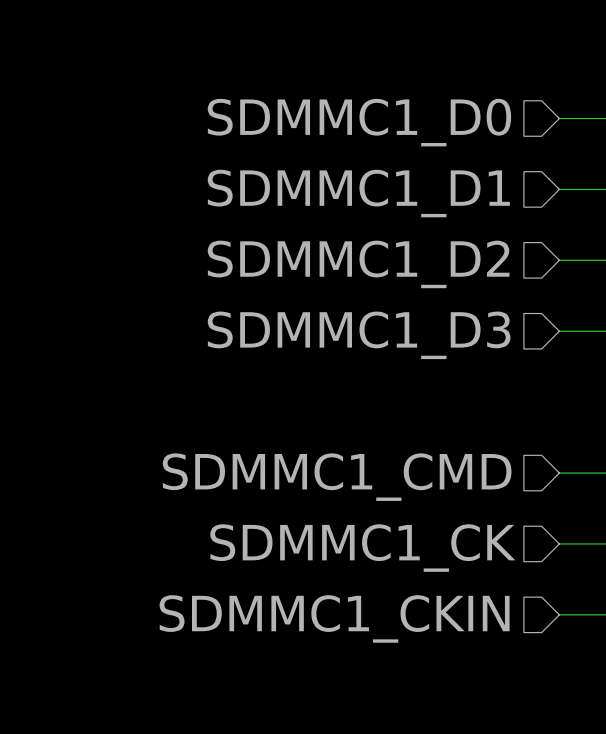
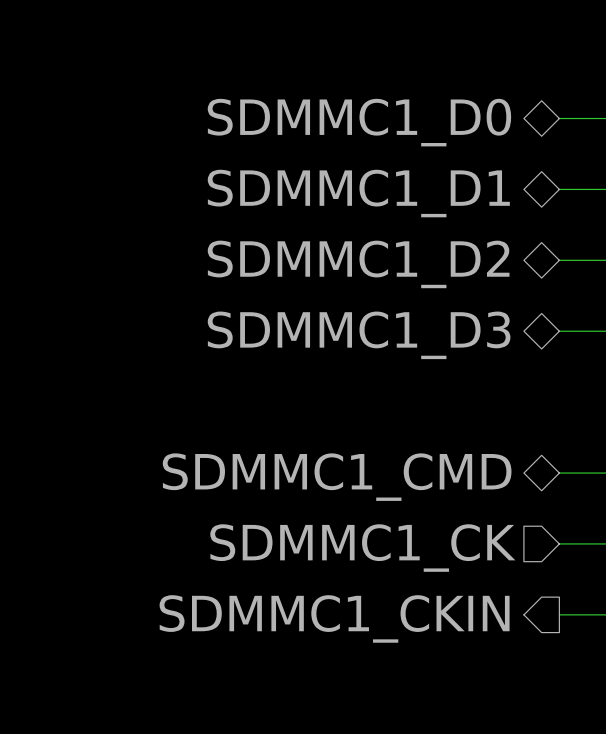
hierarchical label shape: input (359, 122) -> bidirectional (359, 122)
hierarchical label shape: input (358, 193) -> bidirectional (358, 193)
hierarchical label shape: input (358, 264) -> bidirectional (358, 264)
hierarchical label shape: input (359, 335) -> bidirectional (359, 335)
hierarchical label shape: input (337, 477) -> bidirectional (337, 477)
hierarchical label shape: input (334, 618) -> output (334, 618)

